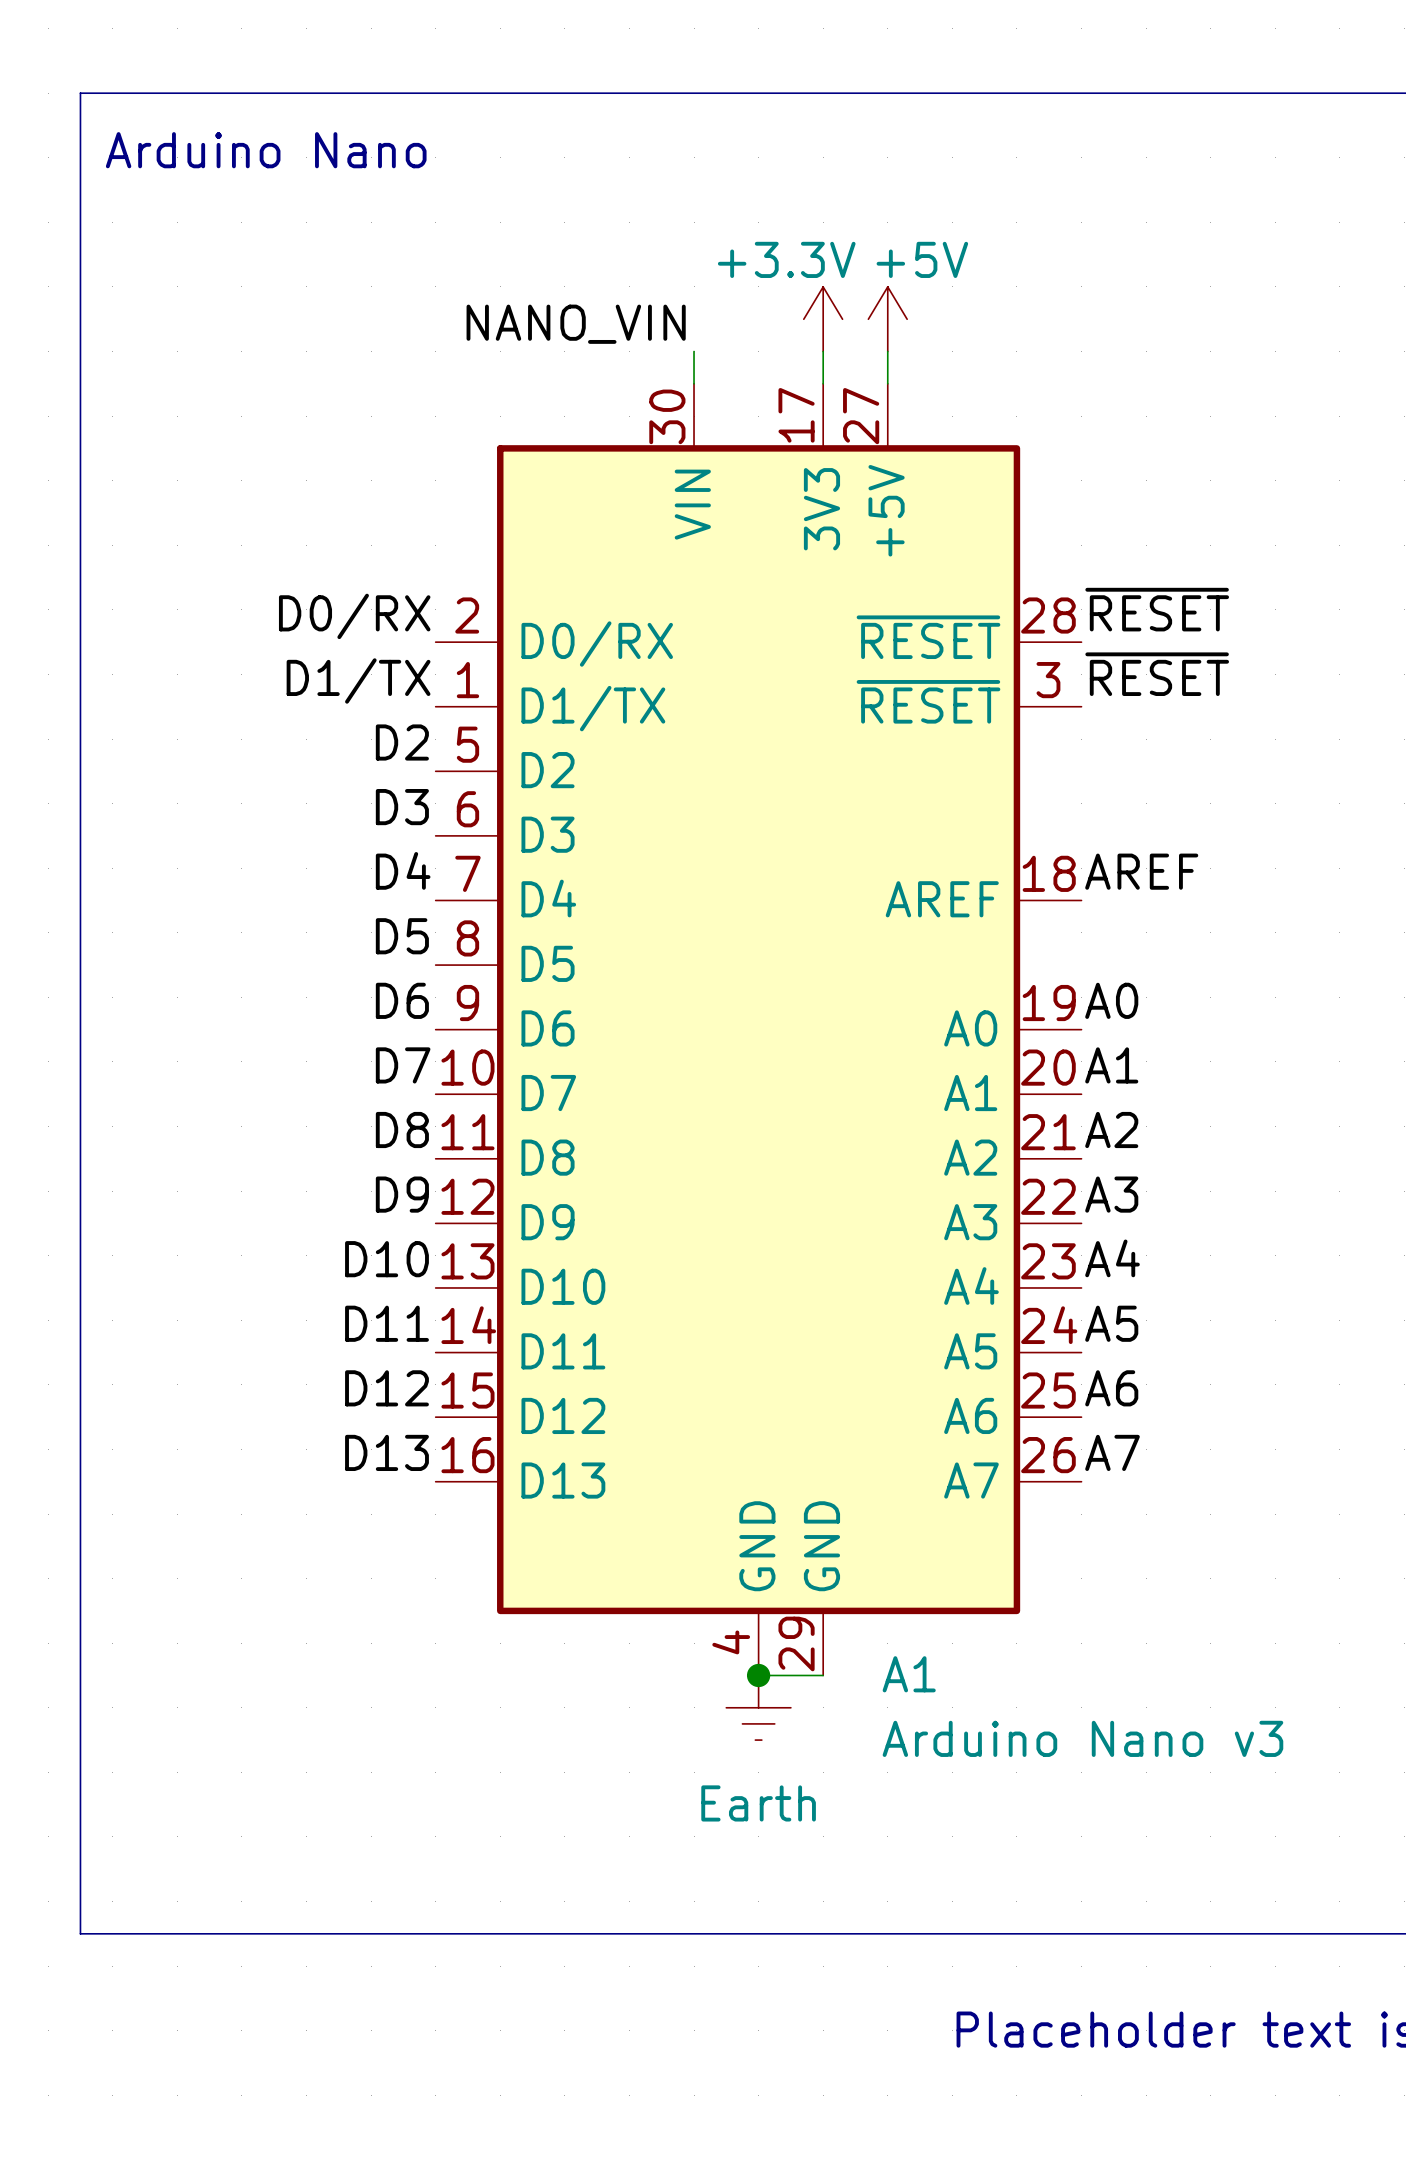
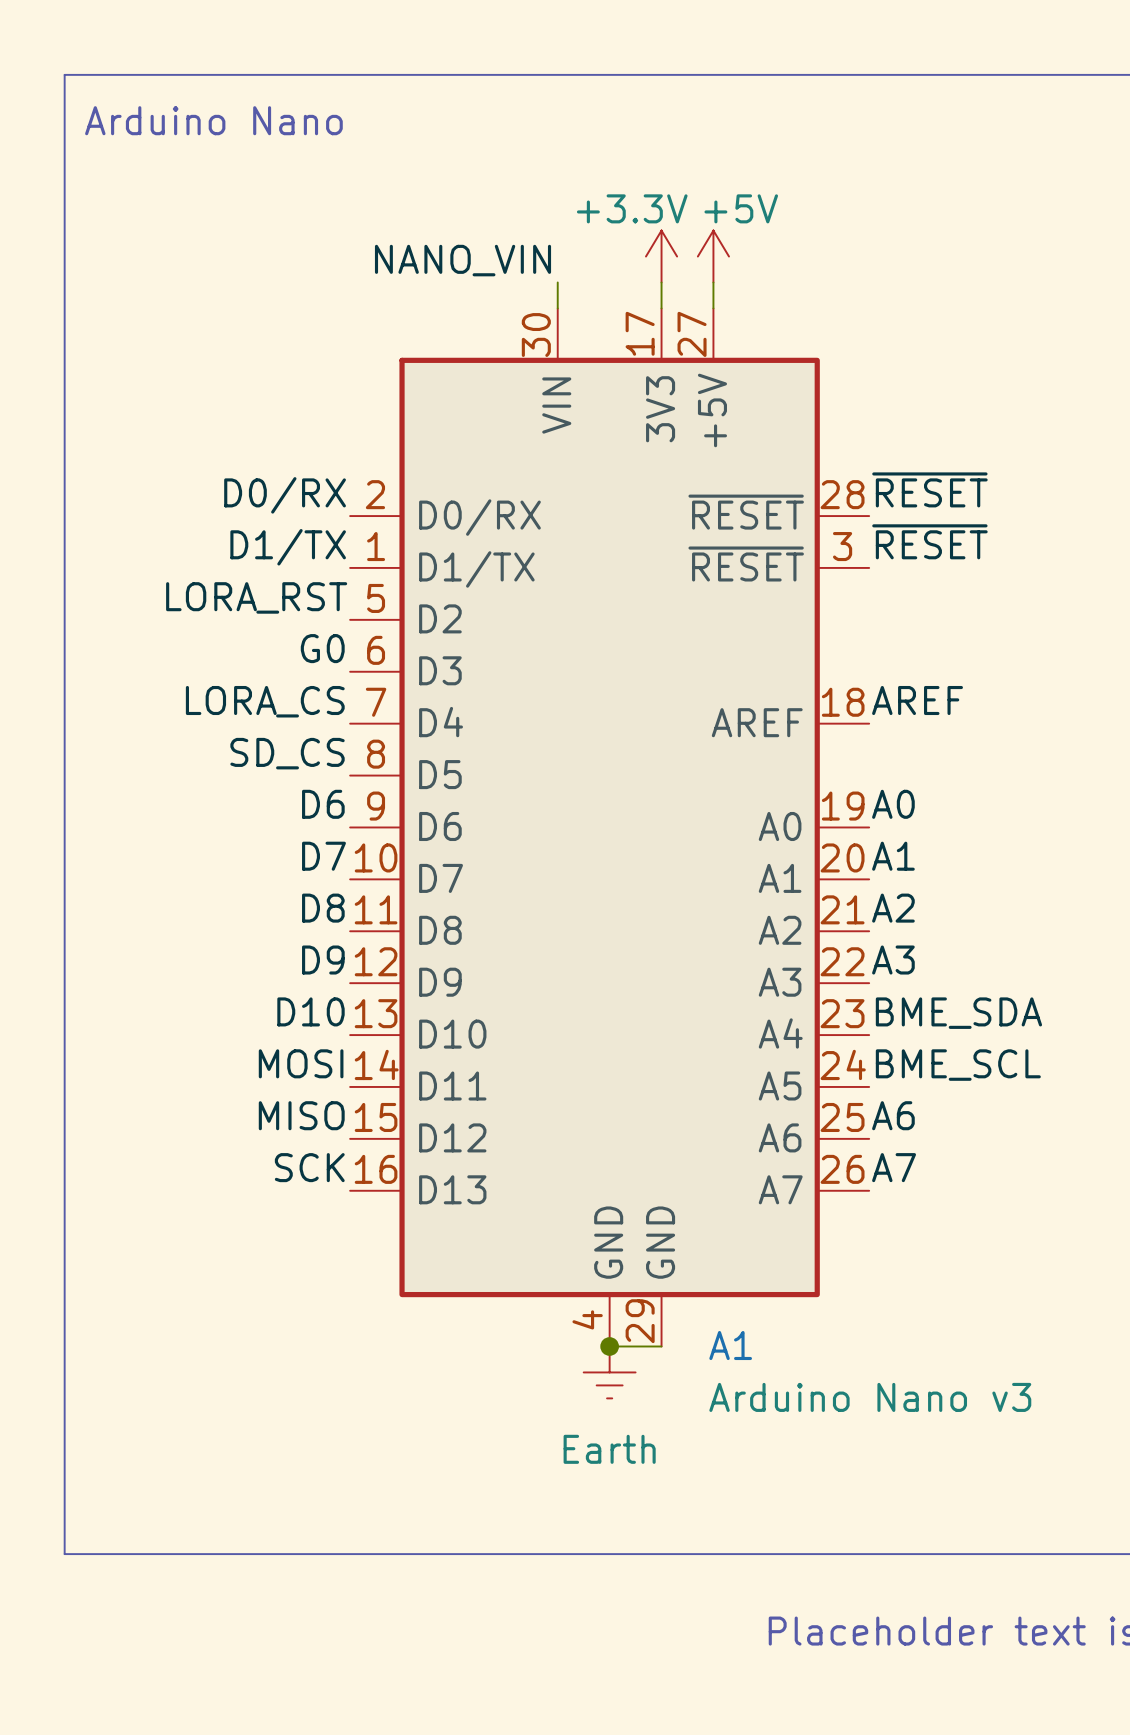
label: D2 (402, 742) -> LORA_RST (256, 597)
label: D3 (402, 807) -> G0 (322, 648)
label: D4 (403, 870) -> LORA_CS (265, 701)
label: D5 (402, 936) -> SD_CS (287, 753)
label: A4 (1112, 1258) -> BME_SDA (958, 1013)
label: D11 (386, 1323) -> MOSI (301, 1063)
label: A5 (1111, 1323) -> BME_SCL (958, 1065)
label: D12 (386, 1388) -> MISO (301, 1115)
label: D13 (386, 1452) -> SCK (309, 1167)

